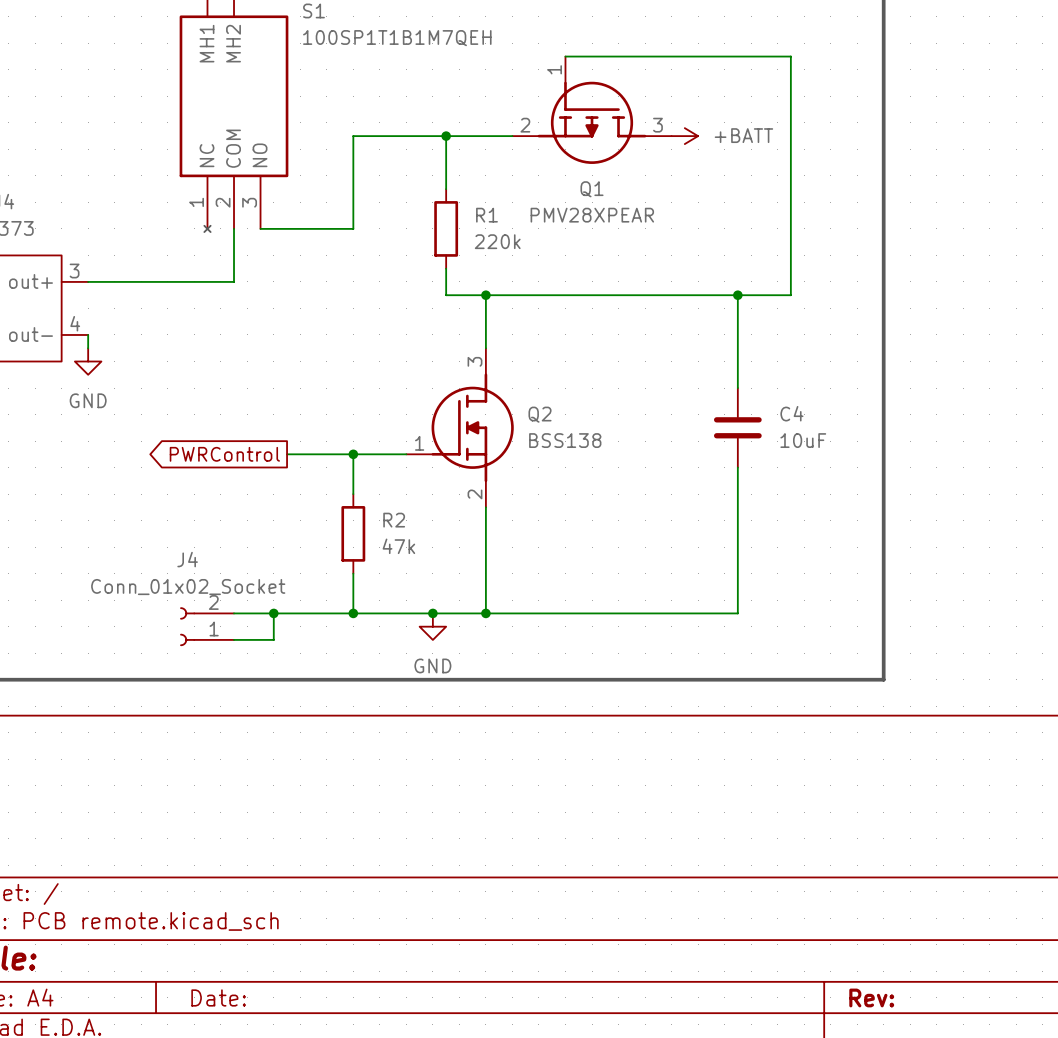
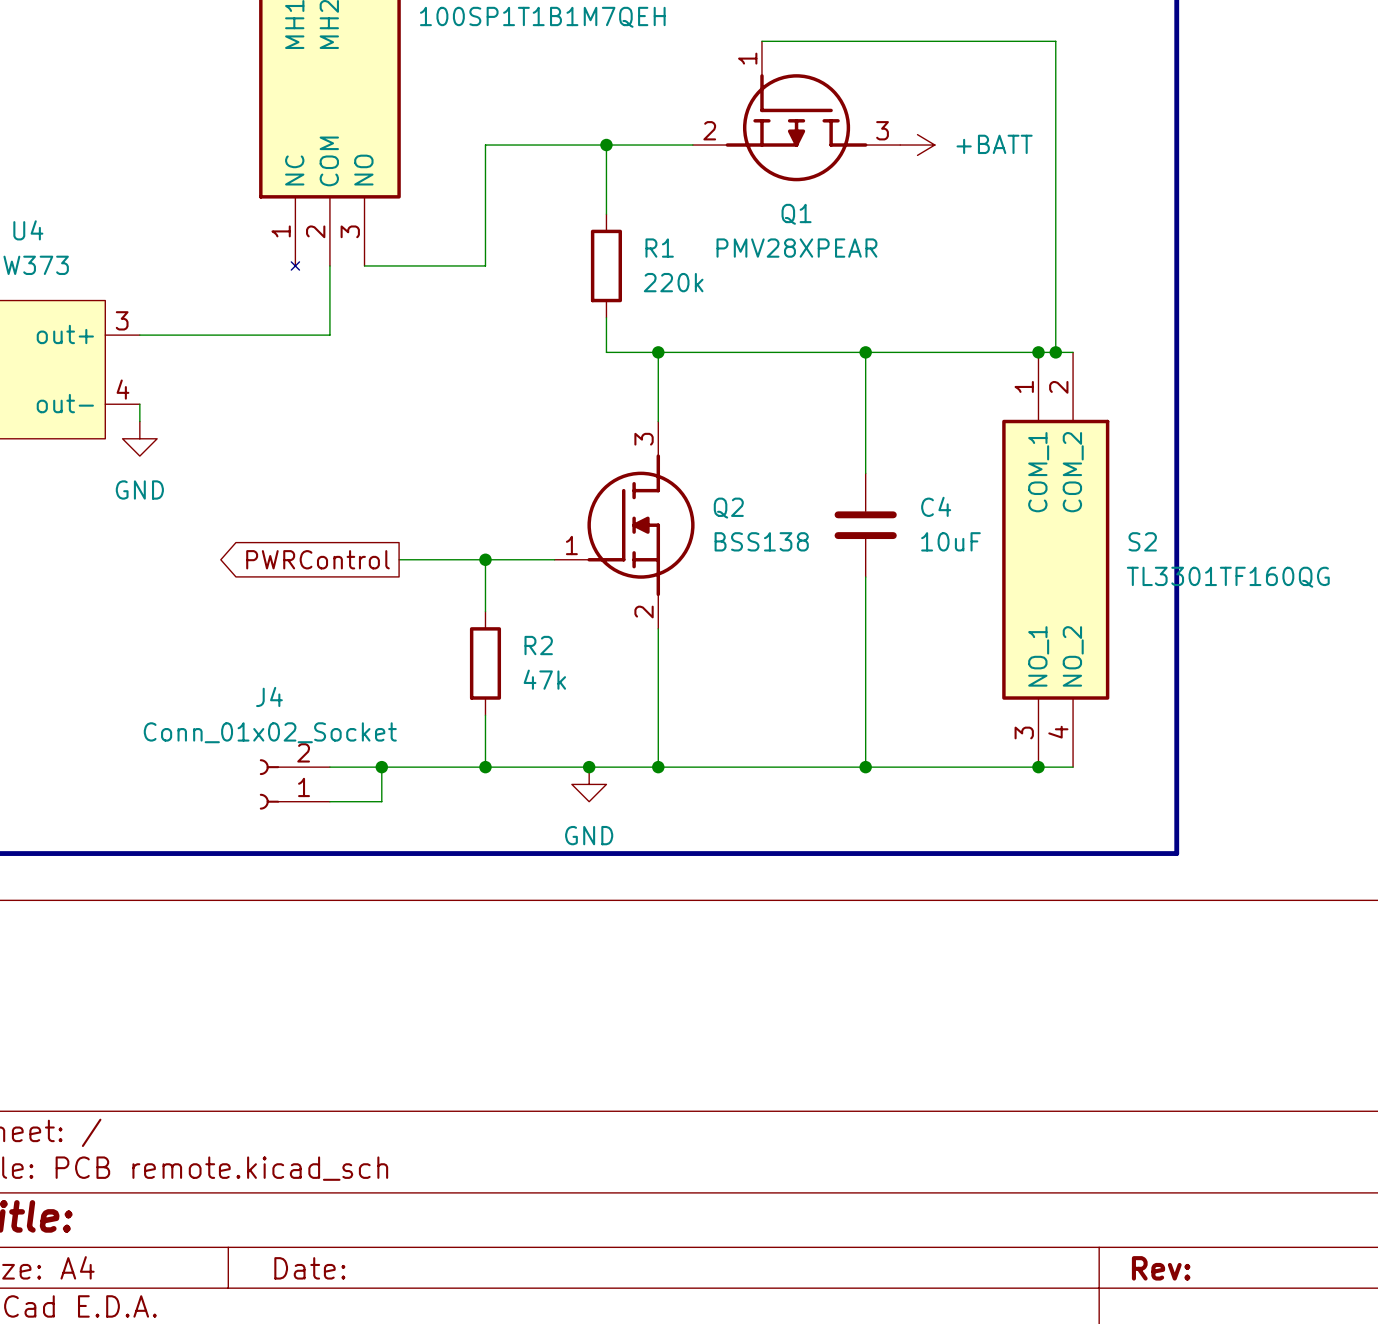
junction: none -> (865, 352)
wire: (737, 295) (737, 388) -> (865, 352) (865, 473)
junction: (737, 295) -> none
junction: none -> (1038, 352)
wire: none -> (1055, 352) (1073, 352)
junction: none -> (1055, 352)
C4 position: (737, 427) -> (865, 525)
S2: none -> TL3301TF160QG (1055, 559)
wire: none -> (865, 577) (865, 767)
wire: (737, 467) (737, 613) -> (1073, 767) (986, 767)
junction: none -> (865, 767)
junction: none -> (1038, 767)

